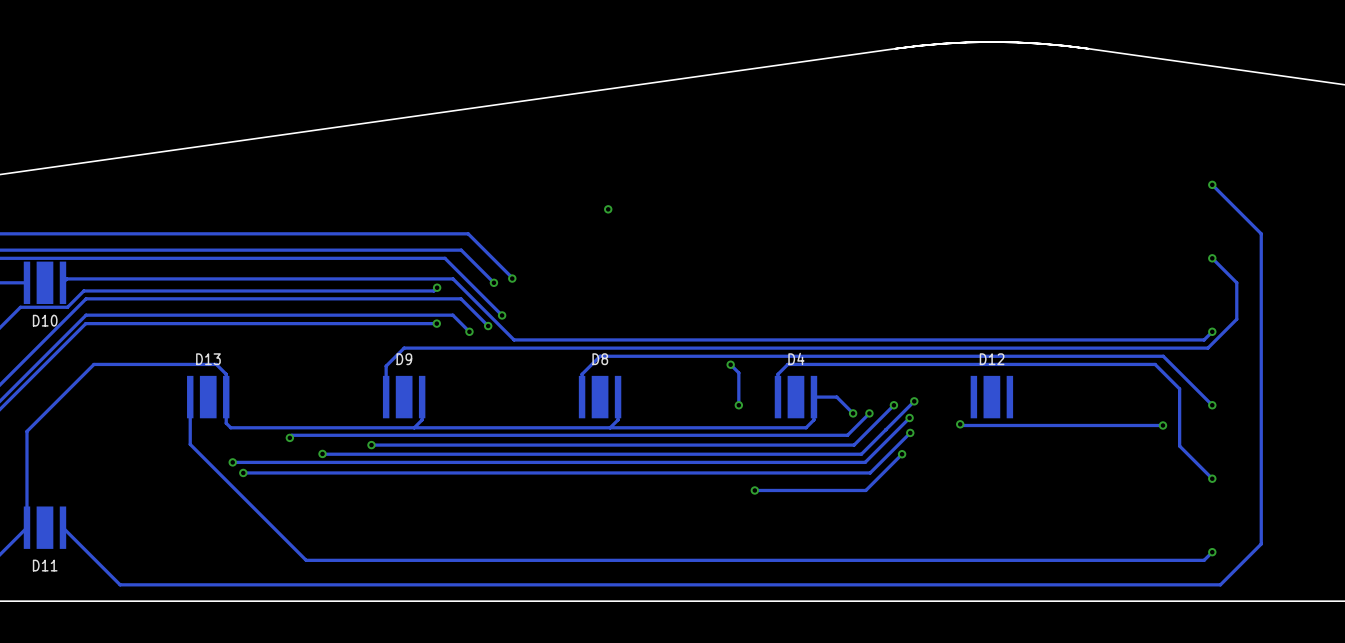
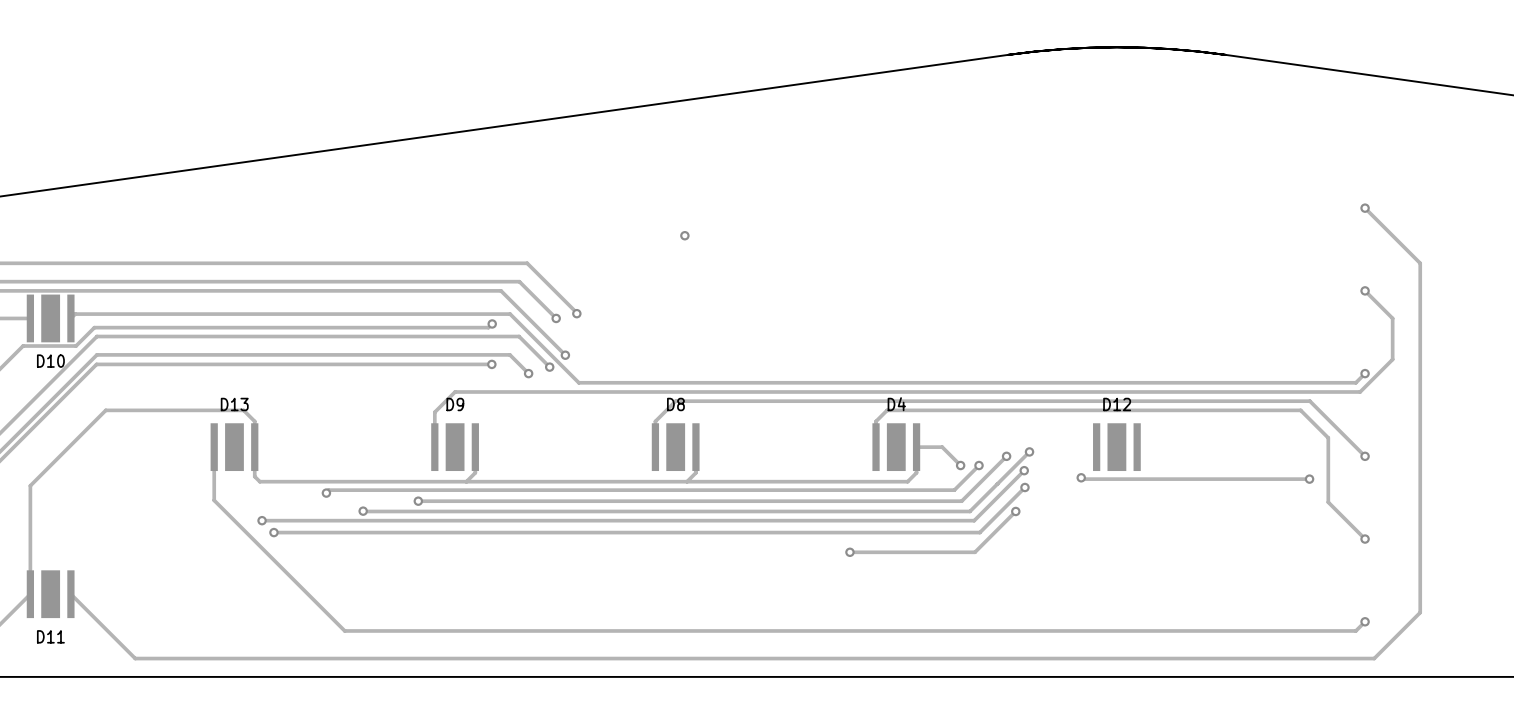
track: (730, 364) (738, 372) (738, 405) -> none
via: (730, 364) -> none
via: (738, 405) -> none

